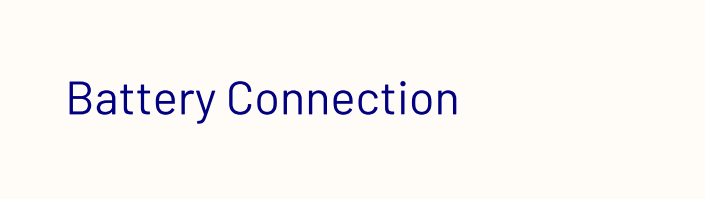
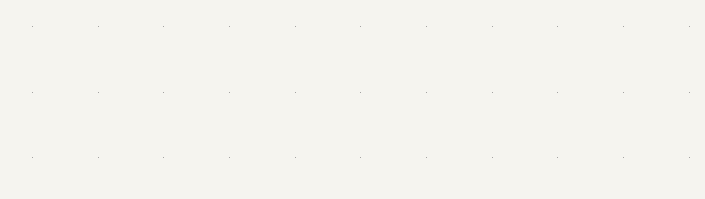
text: Battery Connection (262, 102) -> none

